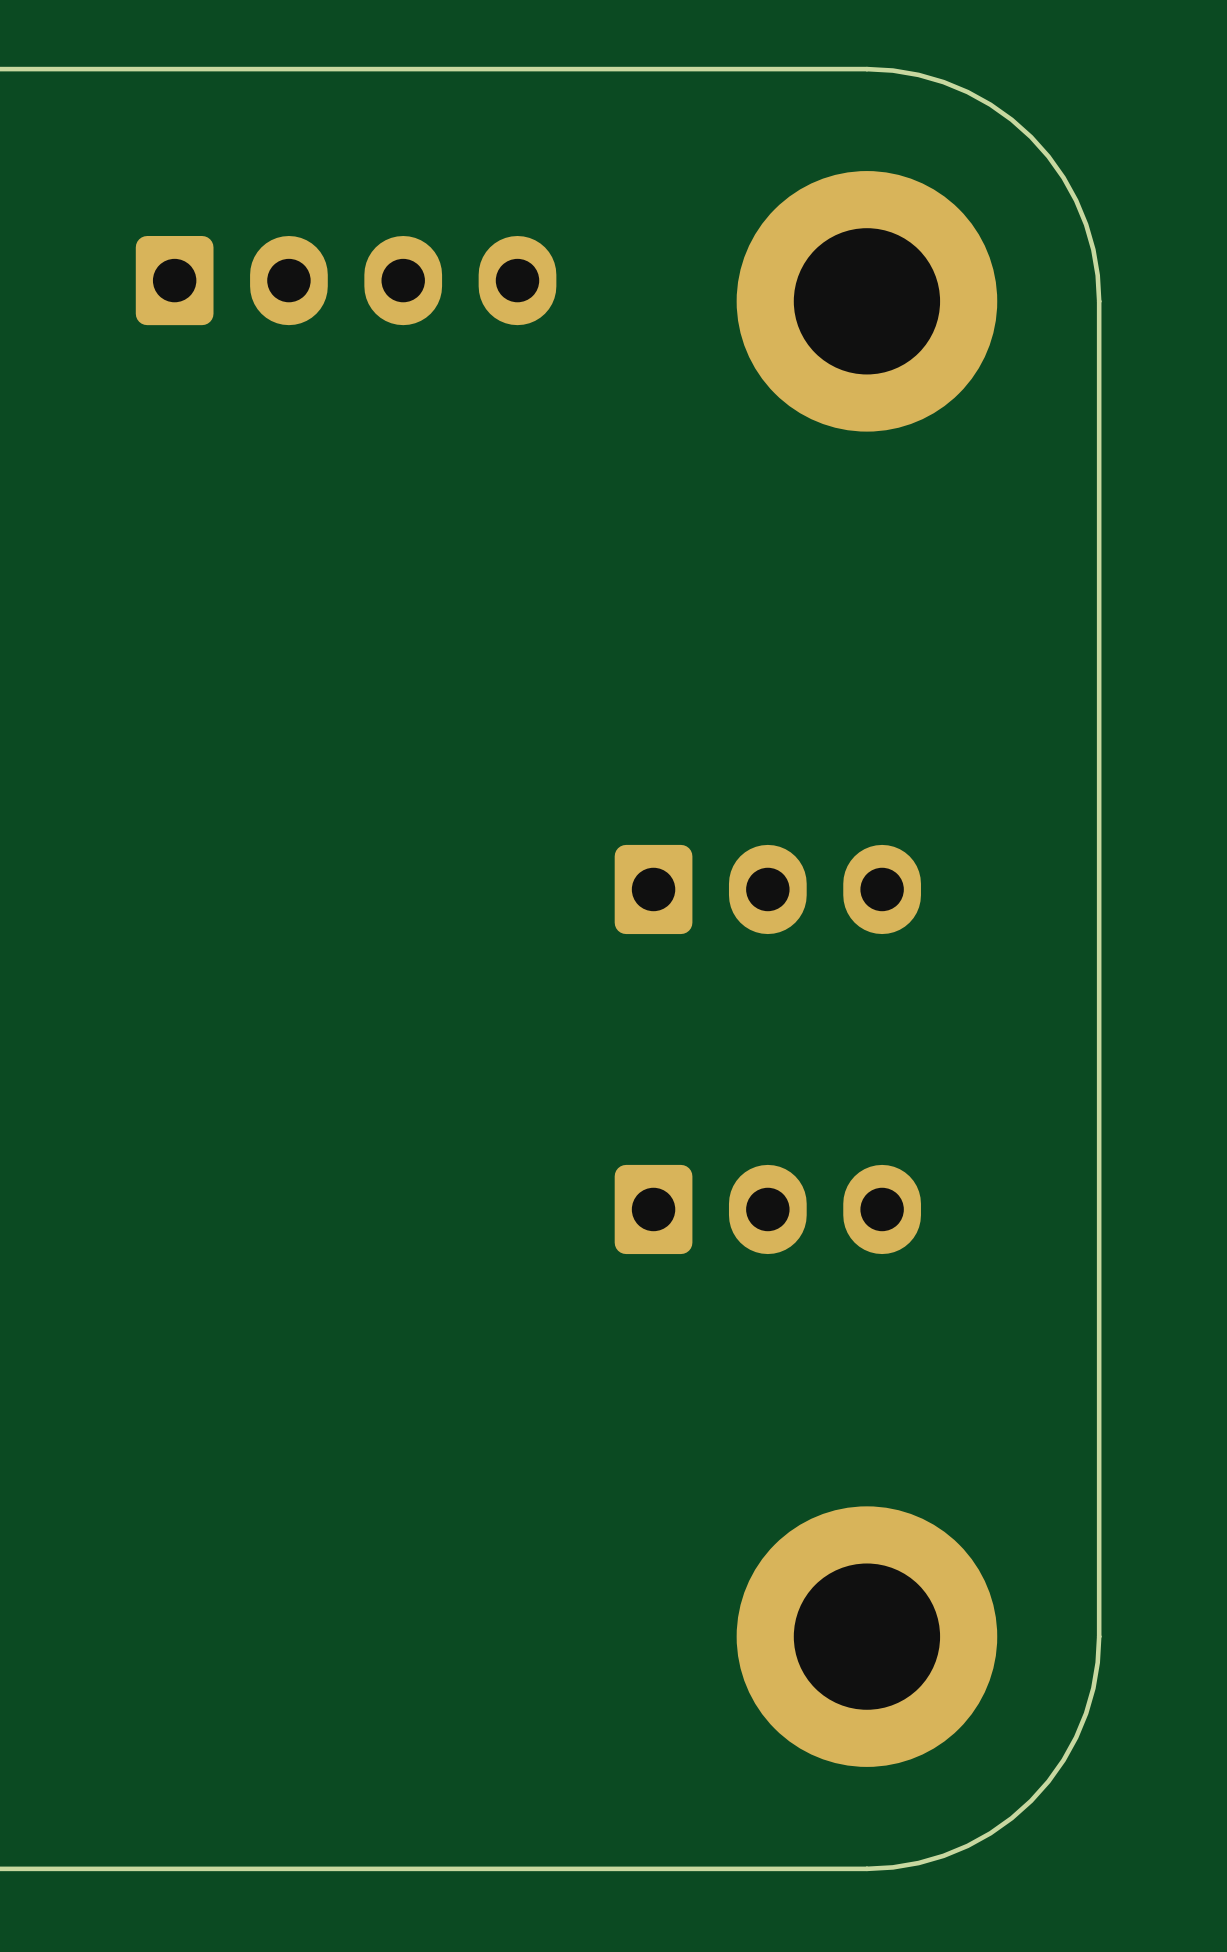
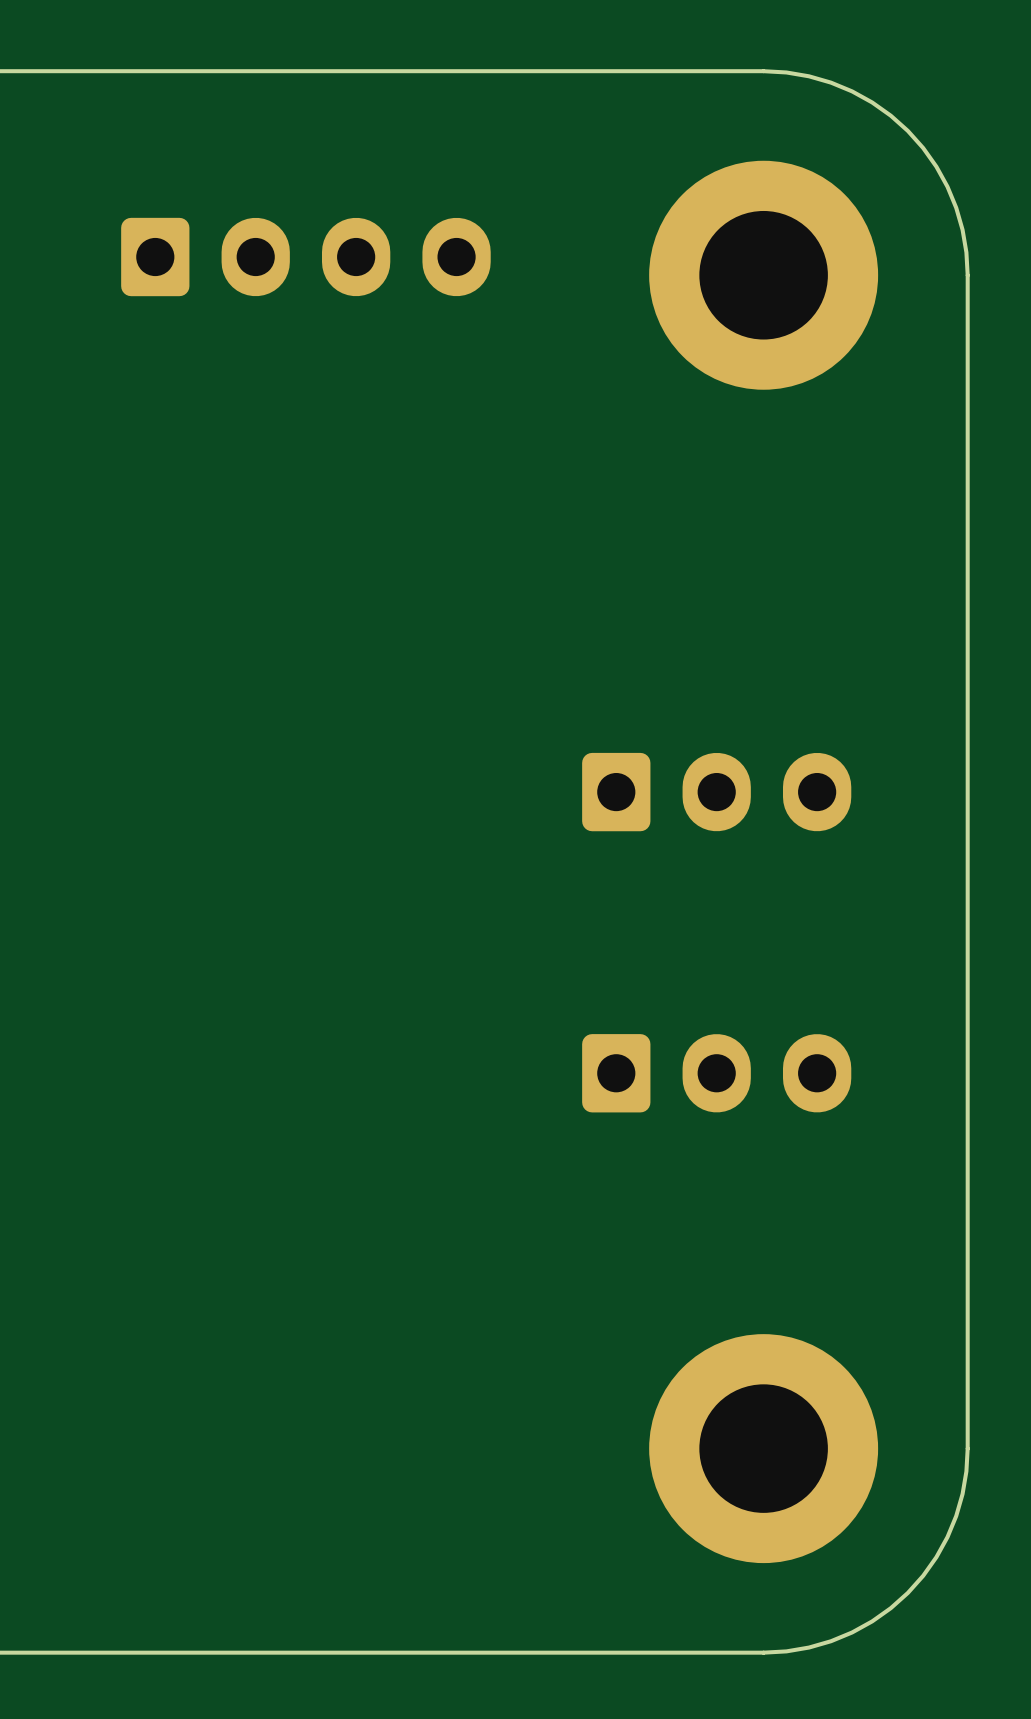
part position: (767, 889) -> (716, 792)
part position: (767, 1209) -> (716, 1073)

